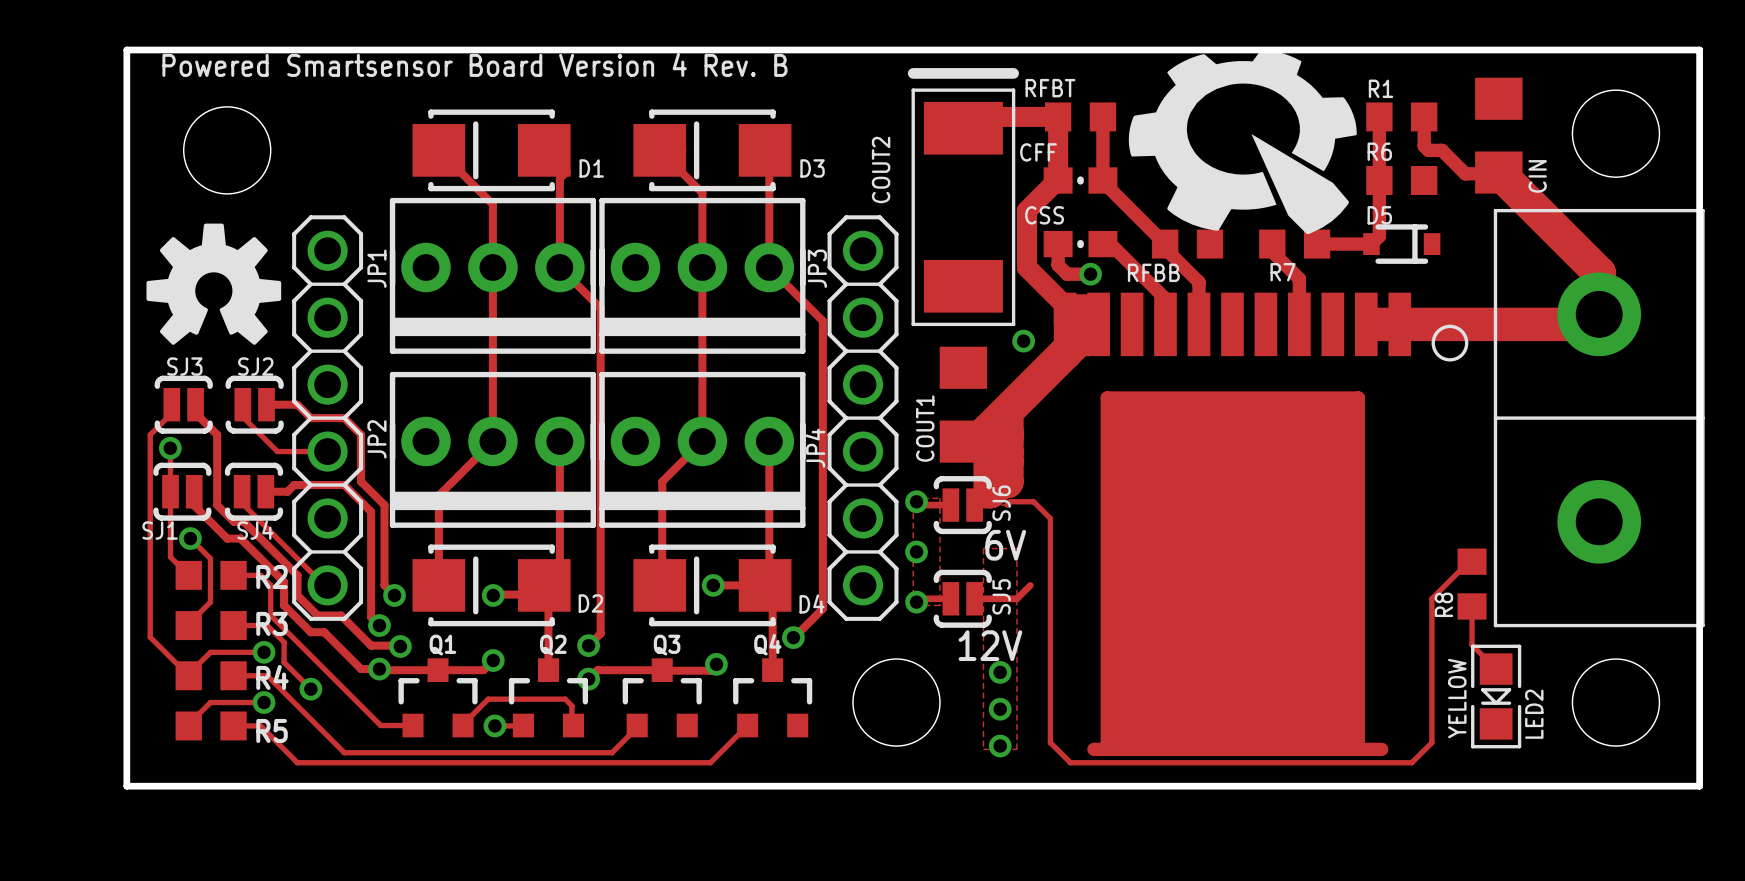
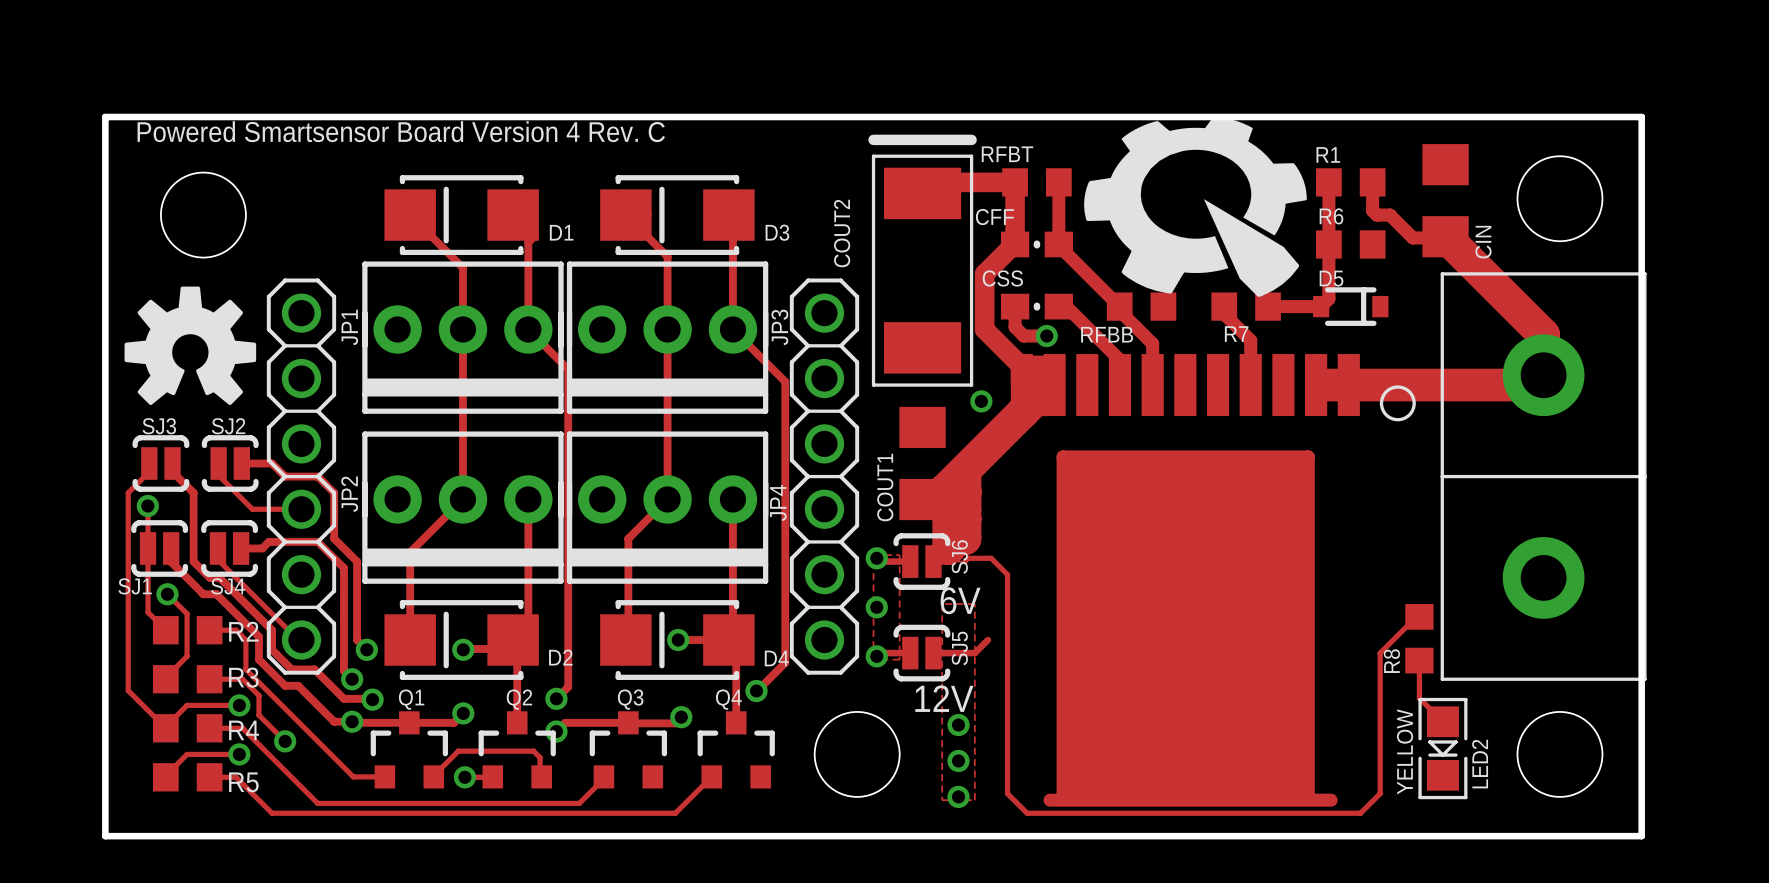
text: Powered Smartsensor Board Version 4 Rev. B (474, 64) -> Powered Smartsensor Board Version 4 Rev. C (401, 131)

